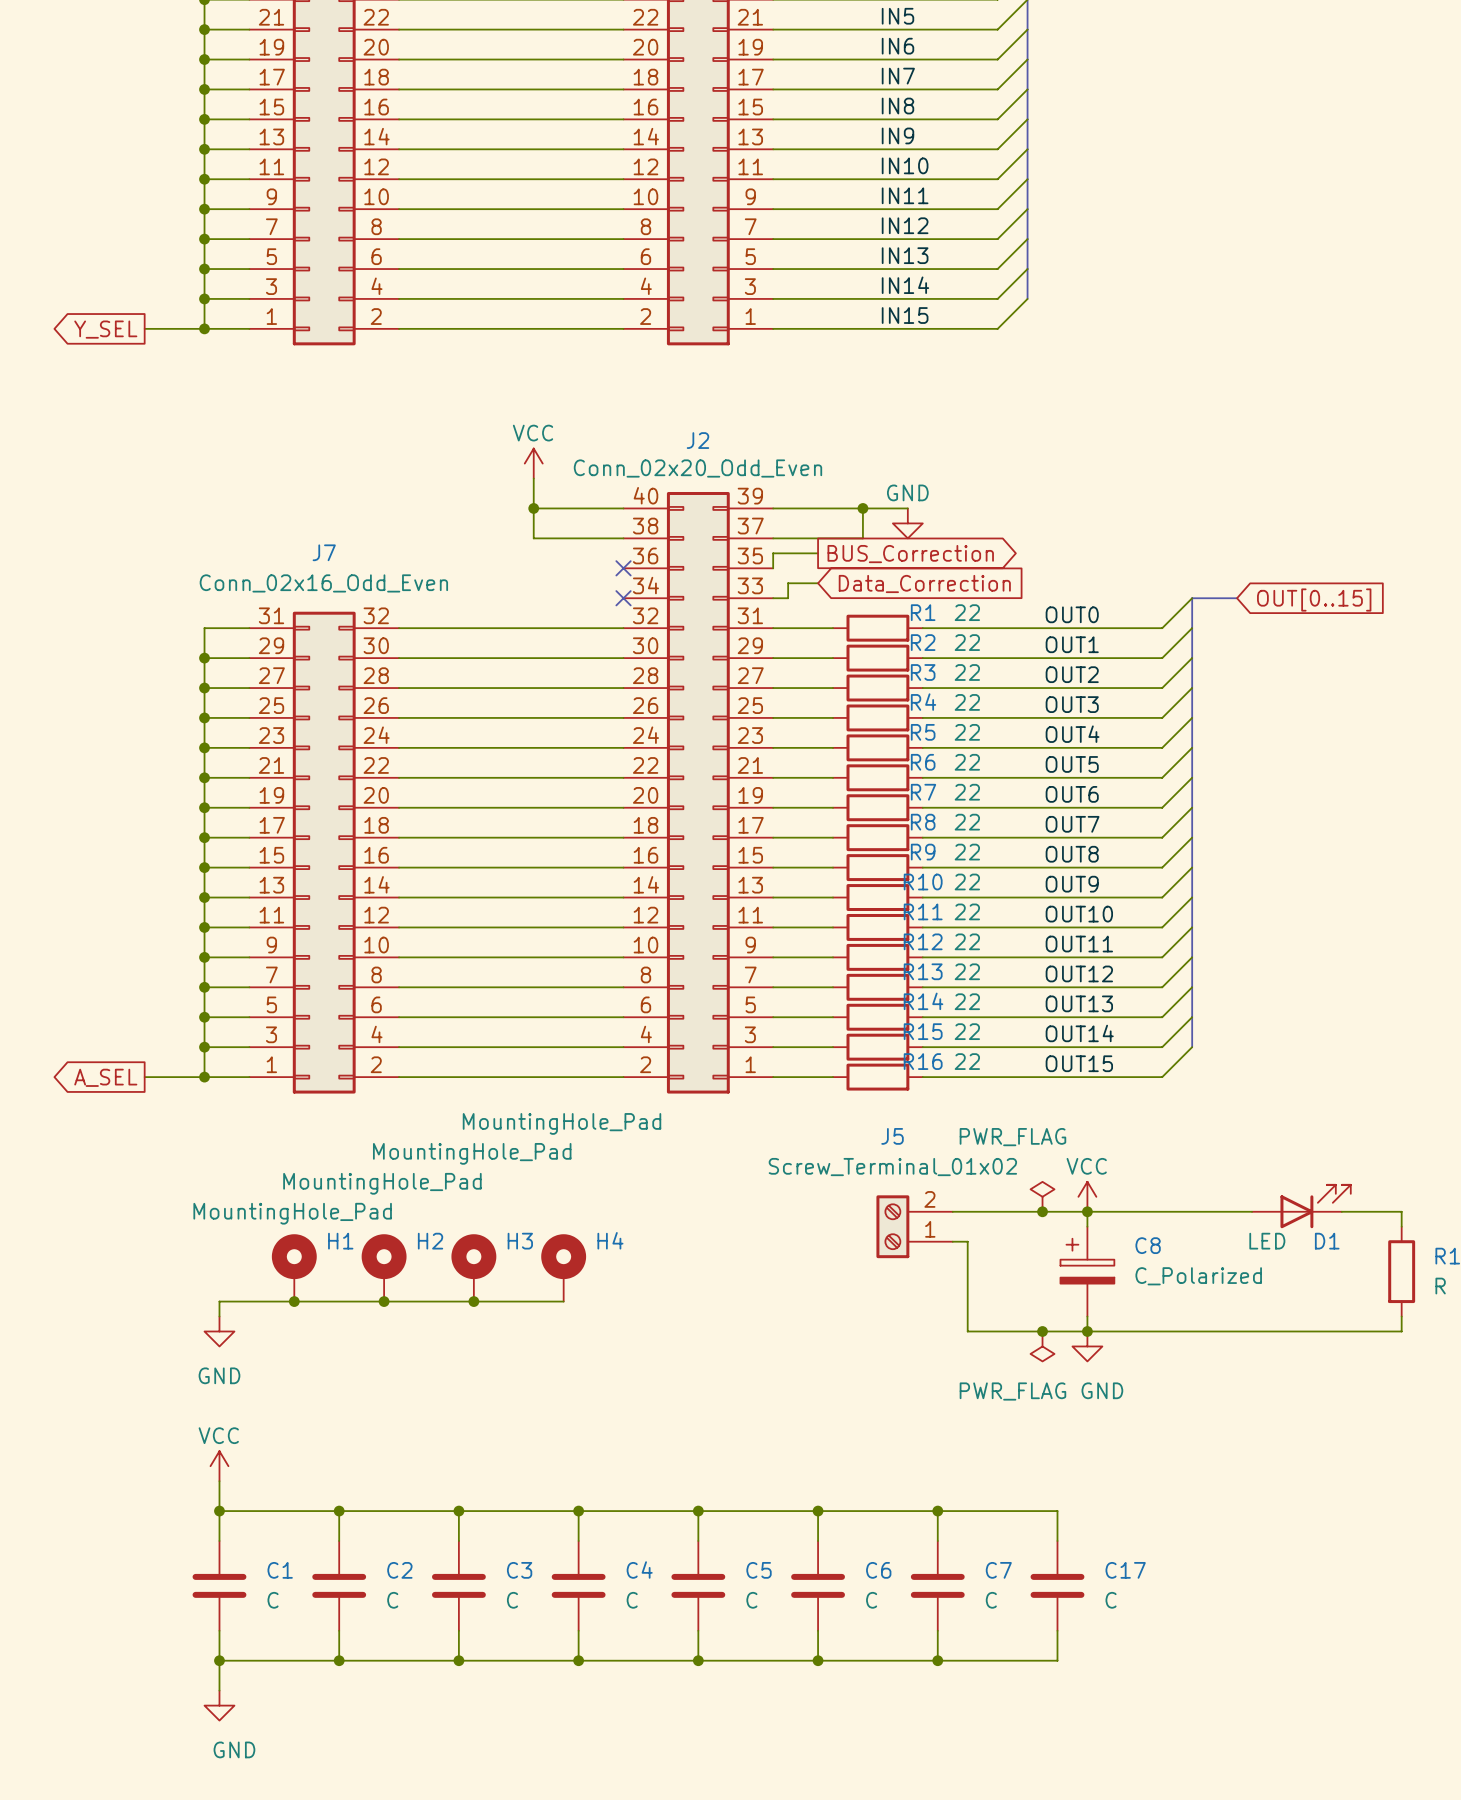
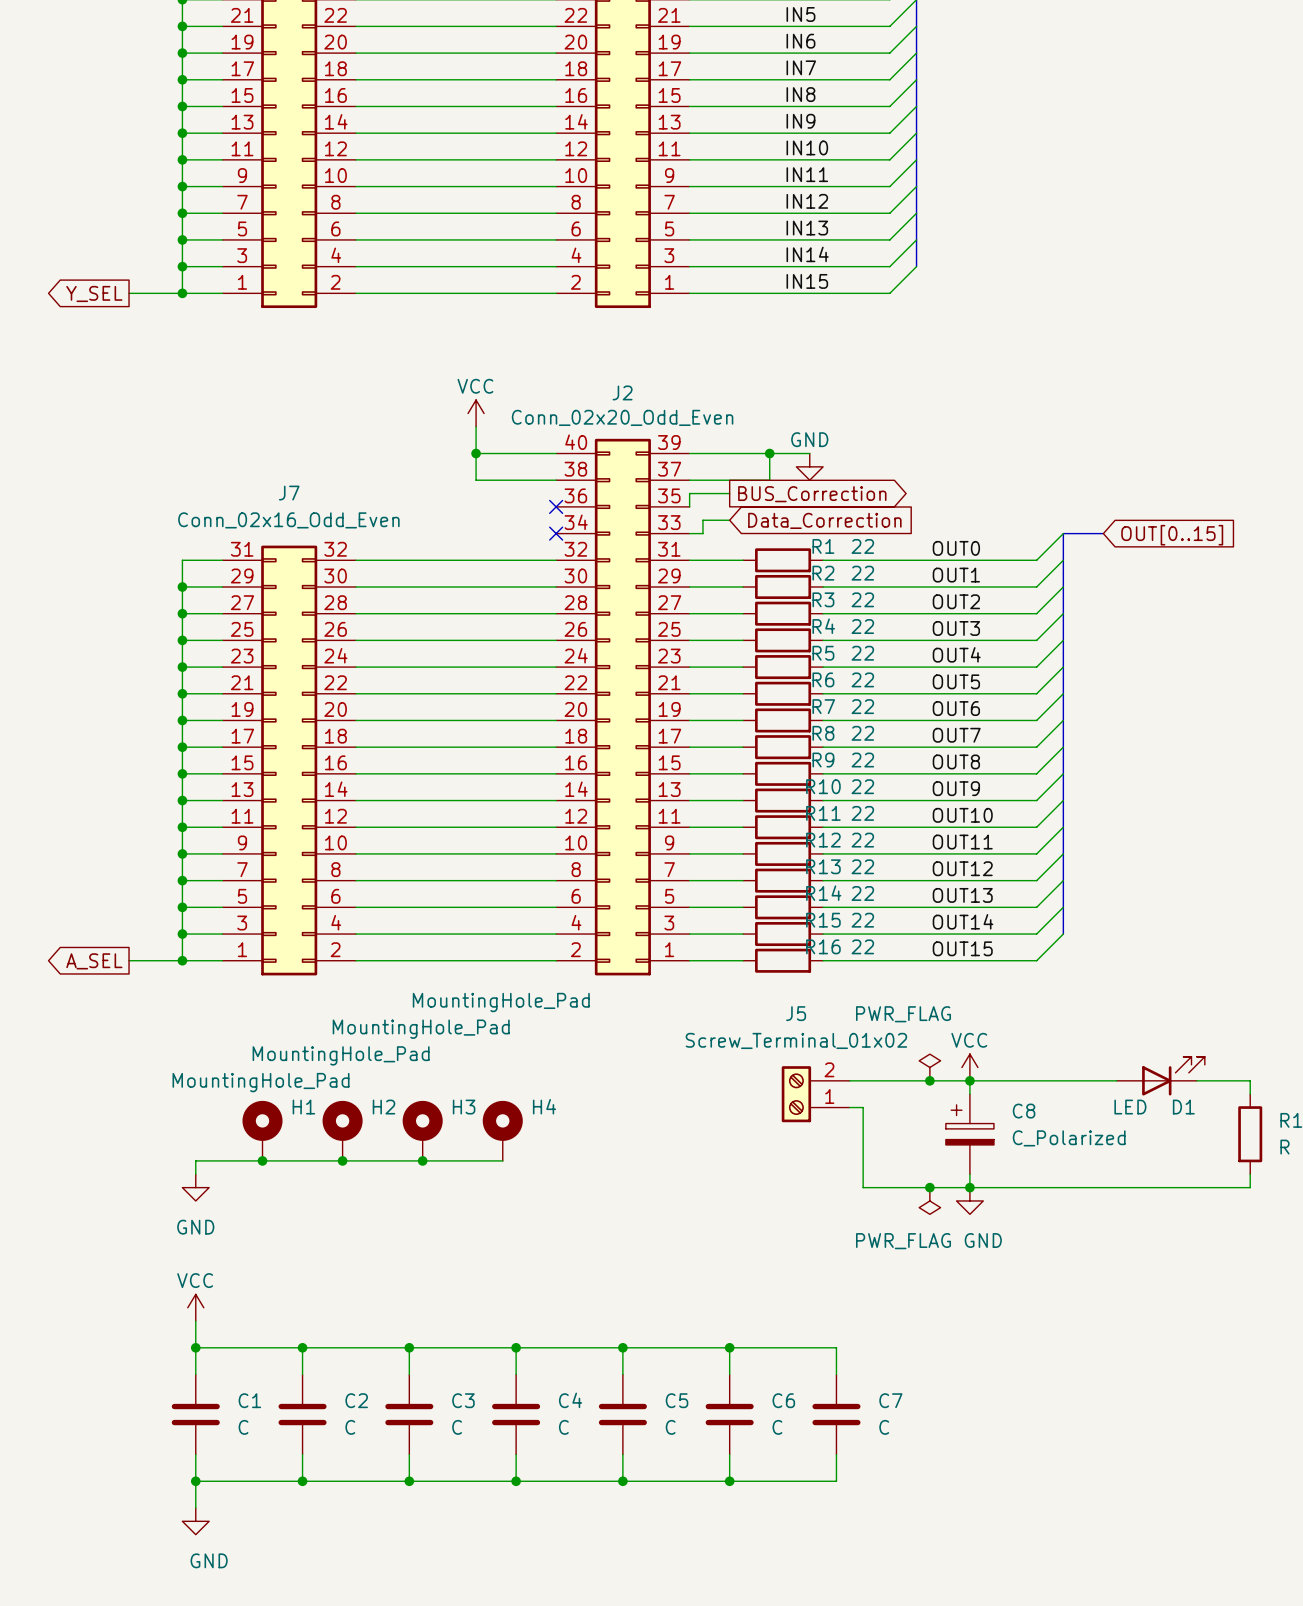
wire: (937, 1511) (1057, 1511) (1057, 1540) -> none
junction: (937, 1511) -> none
C17: C (1057, 1585) -> none
wire: (1057, 1630) (1057, 1660) (937, 1660) -> none
junction: (937, 1660) -> none

